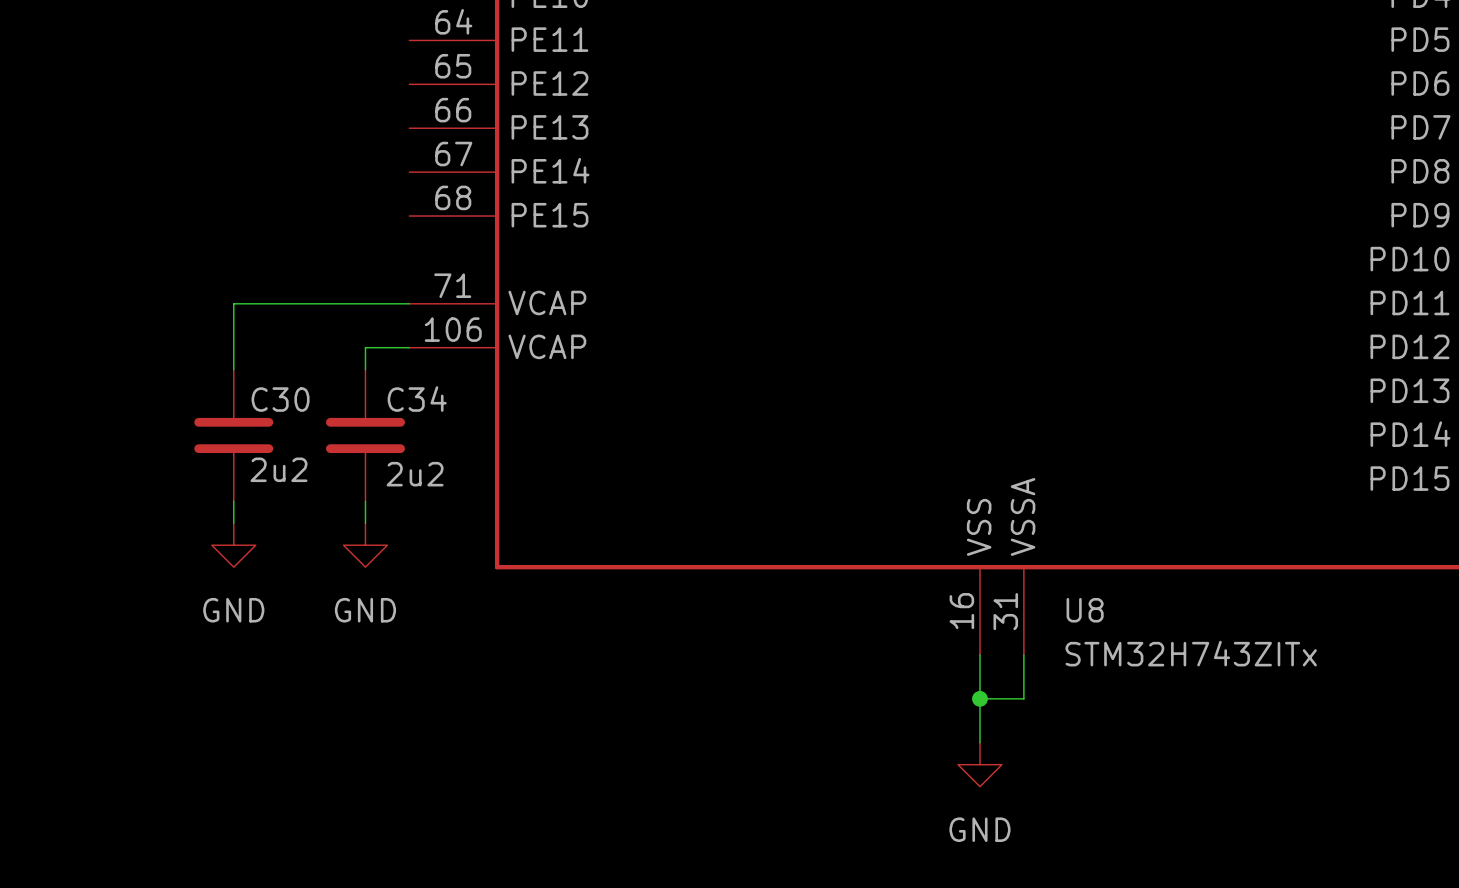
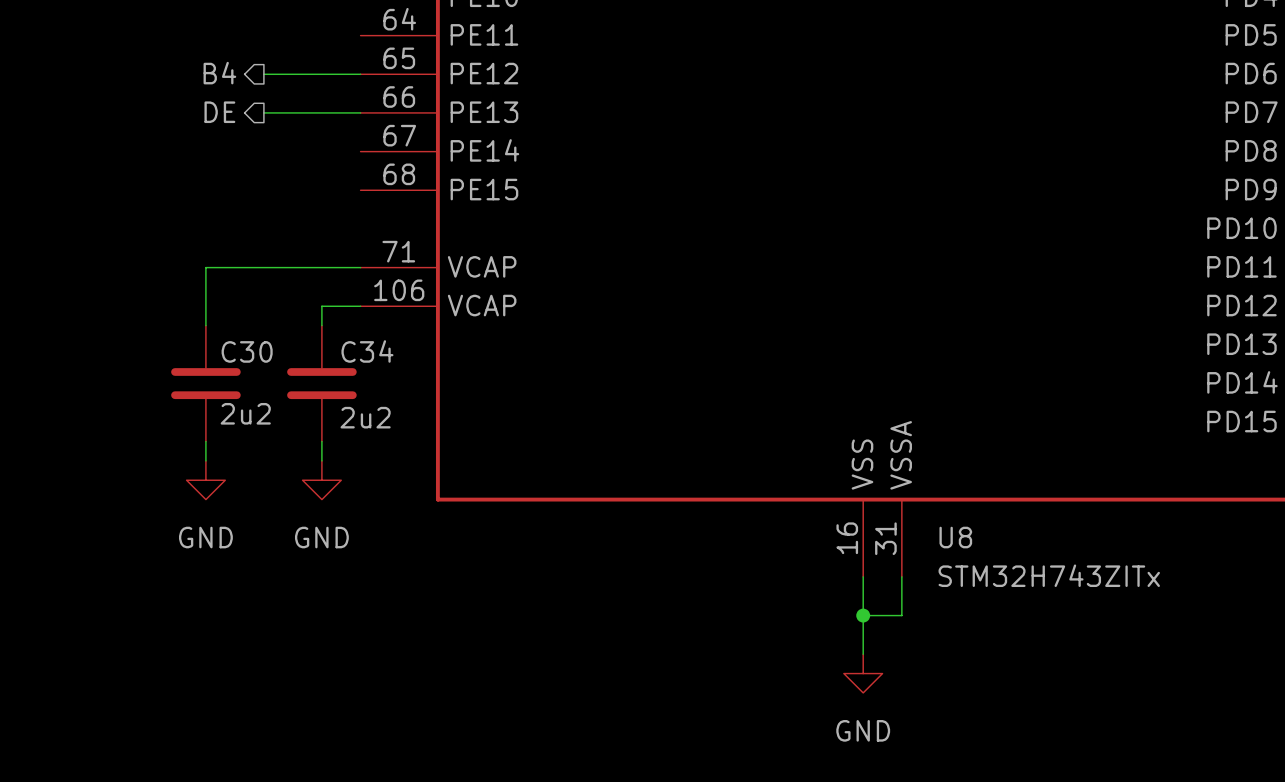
hierarchical label: none -> B4 (219, 73)
wire: none -> (263, 74) (360, 74)
hierarchical label: none -> DE (219, 112)
wire: none -> (263, 112) (360, 112)

